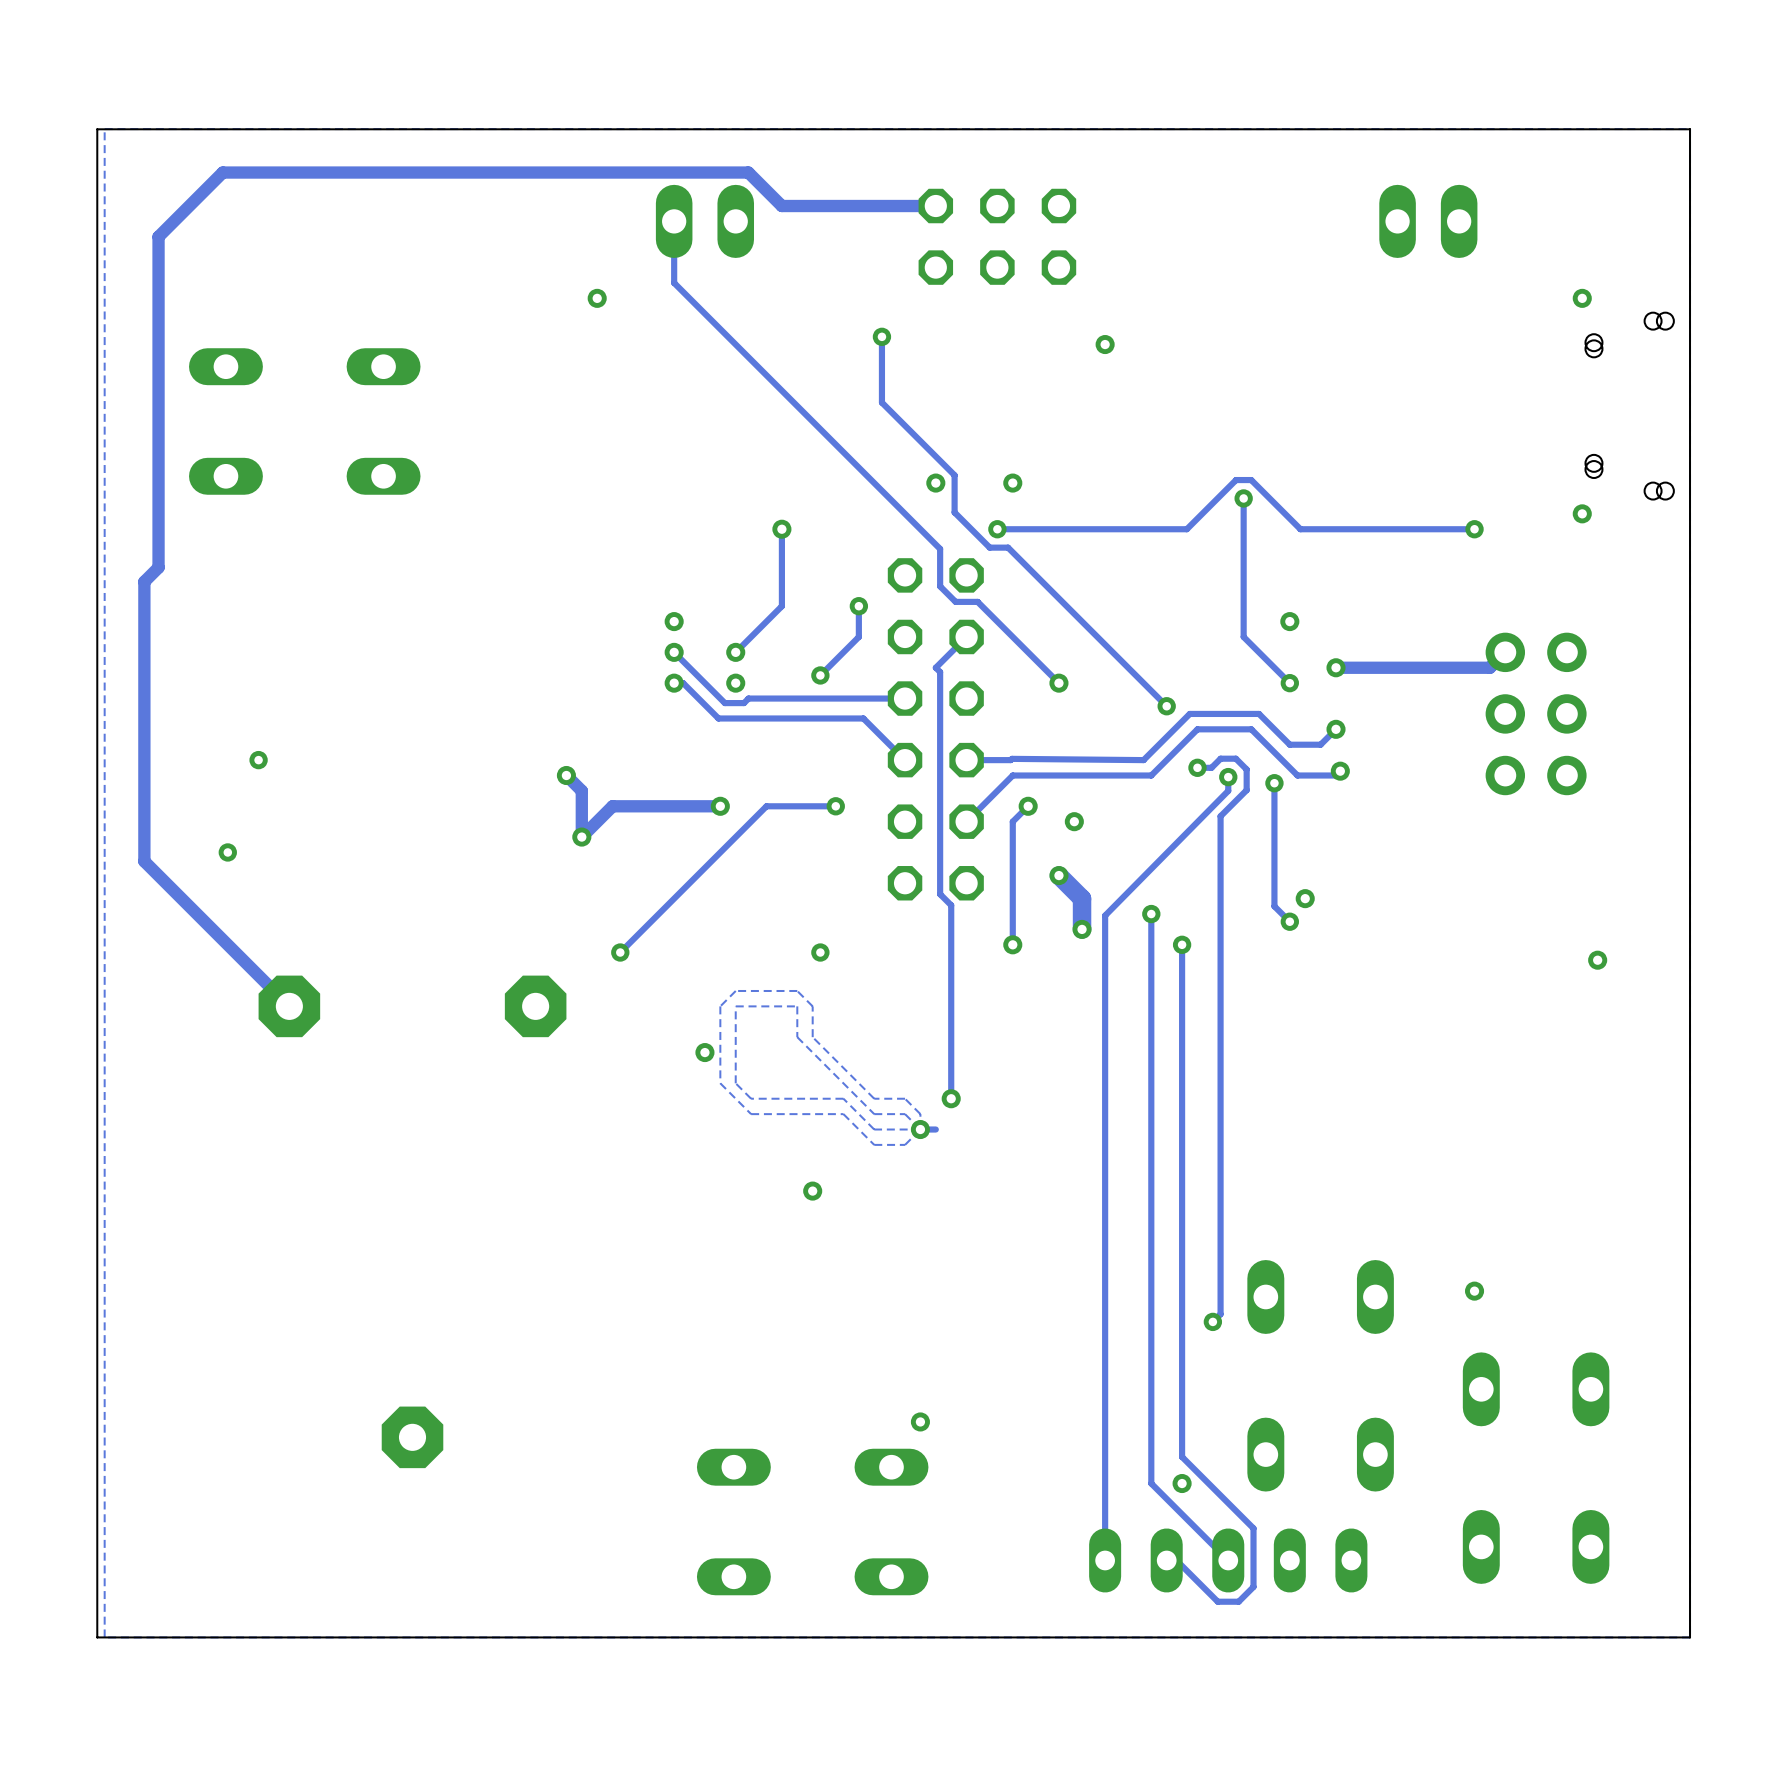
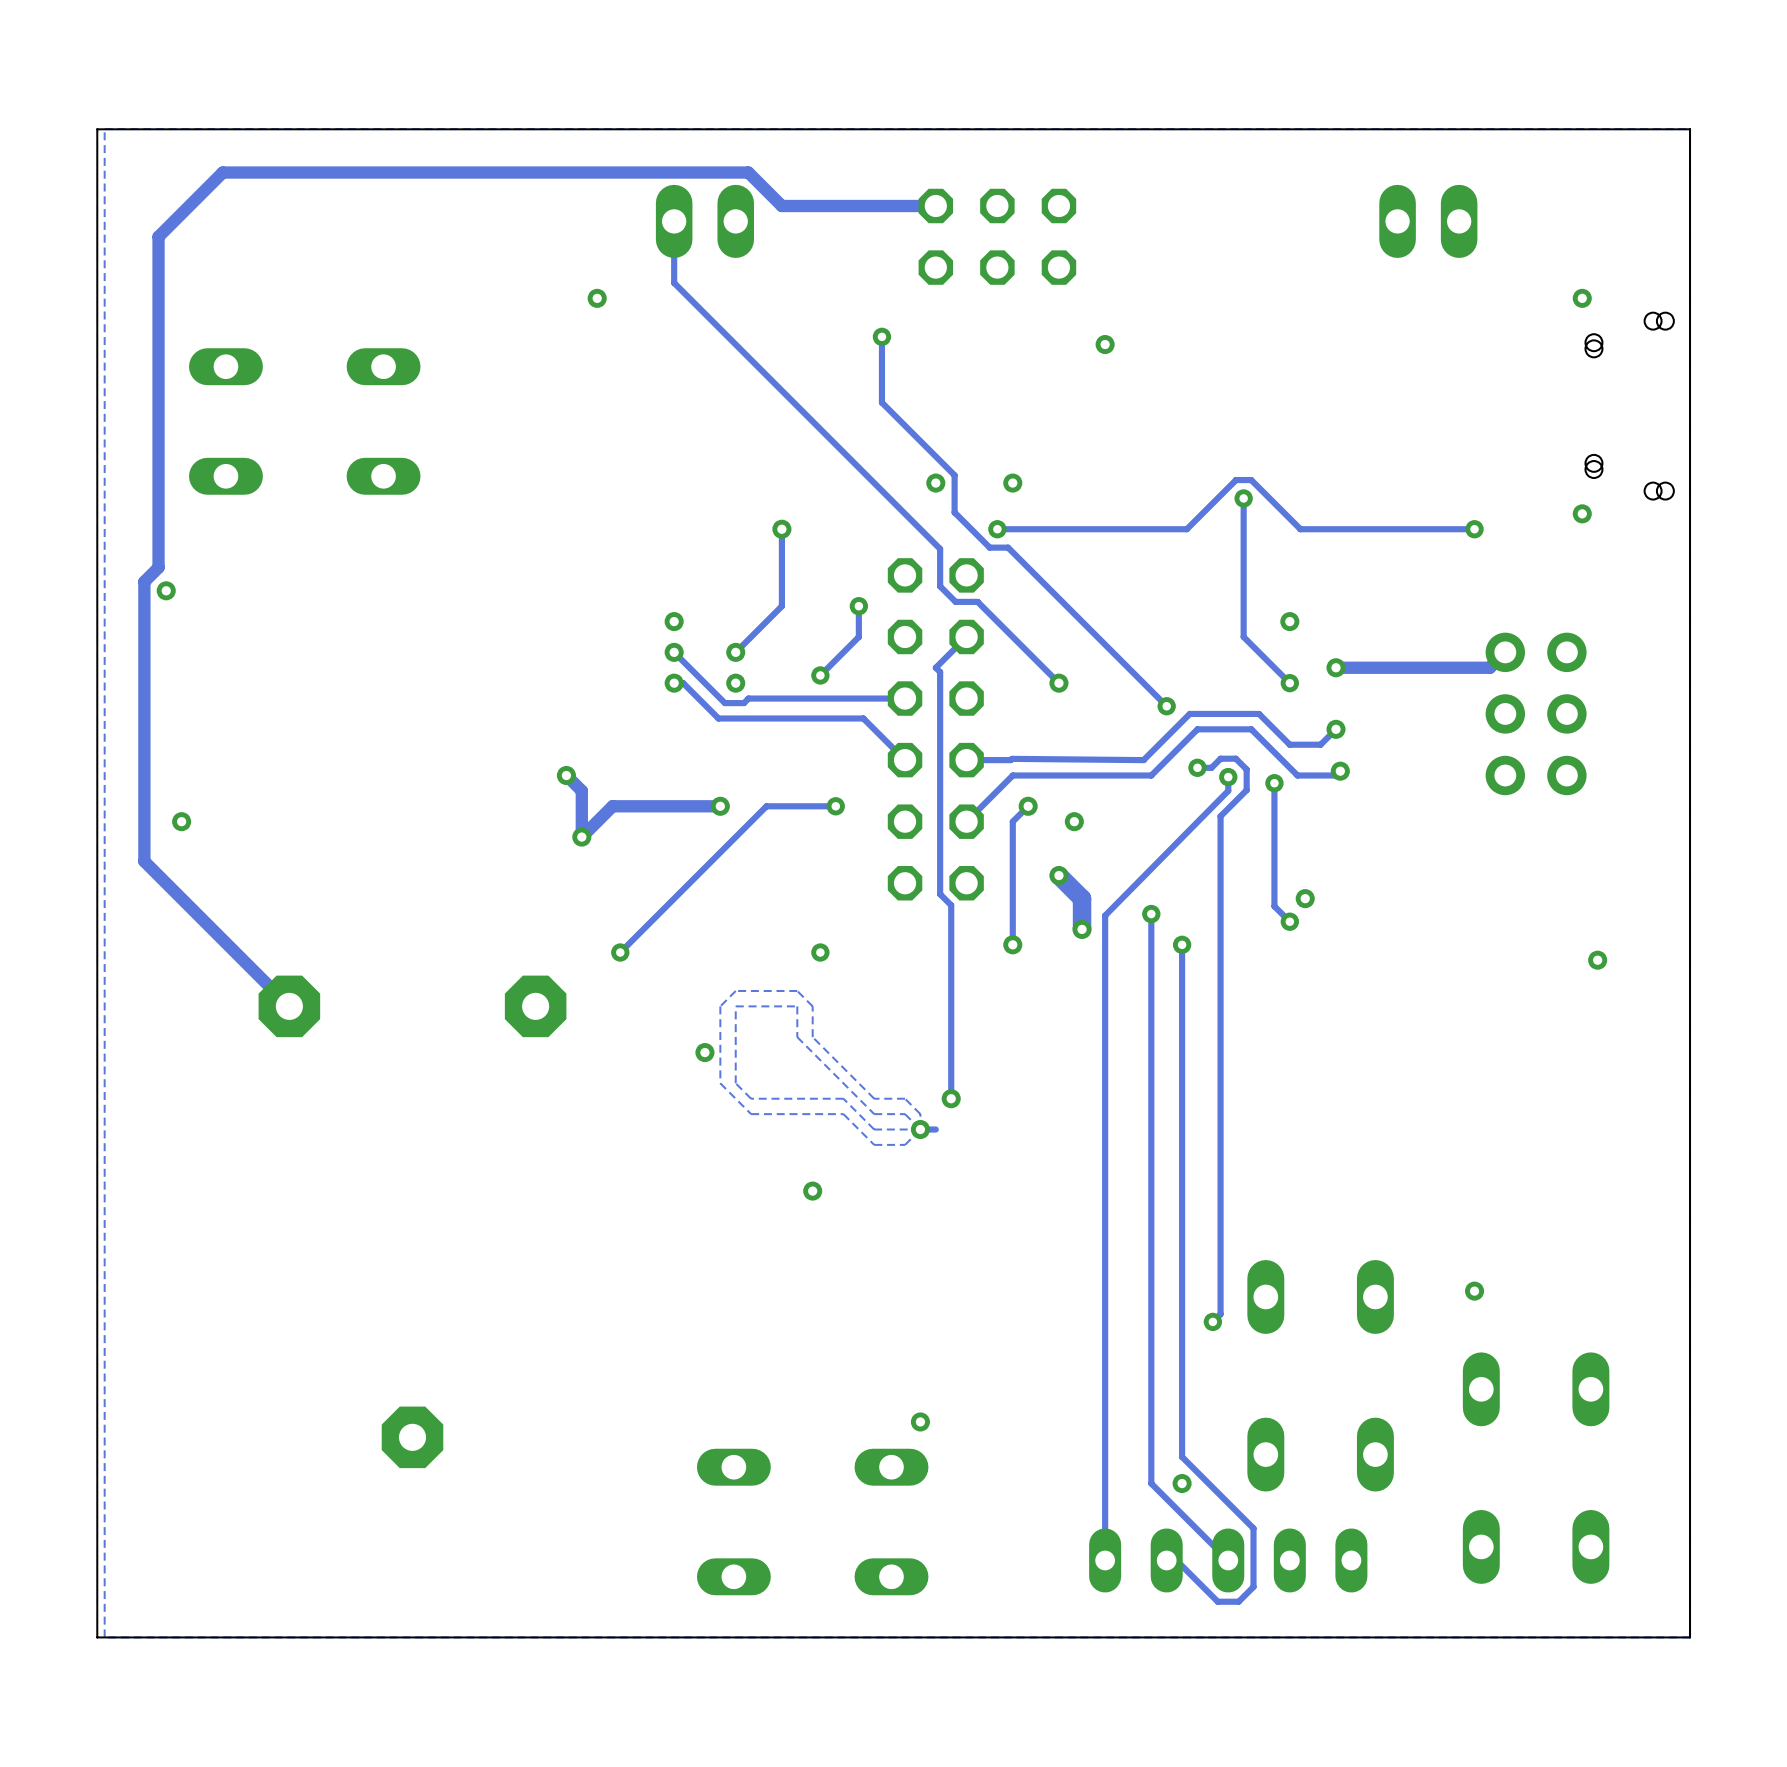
via: none -> (166, 590)
via: (258, 760) -> none
via: none -> (181, 821)
via: (227, 852) -> none

